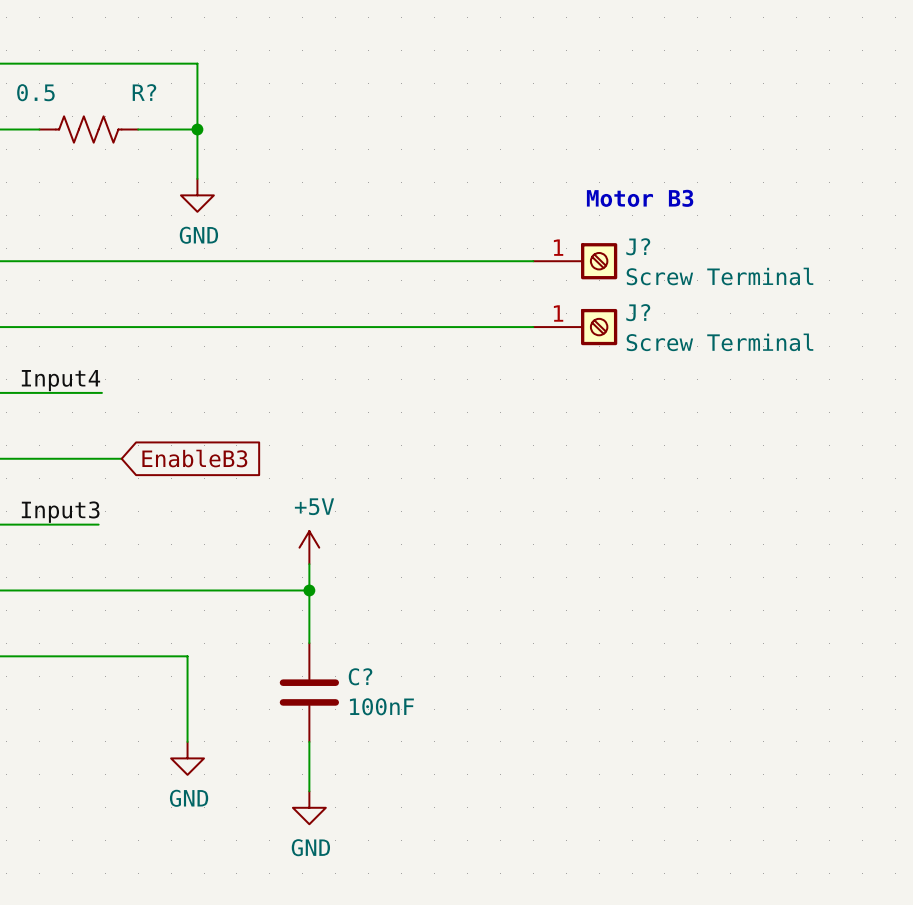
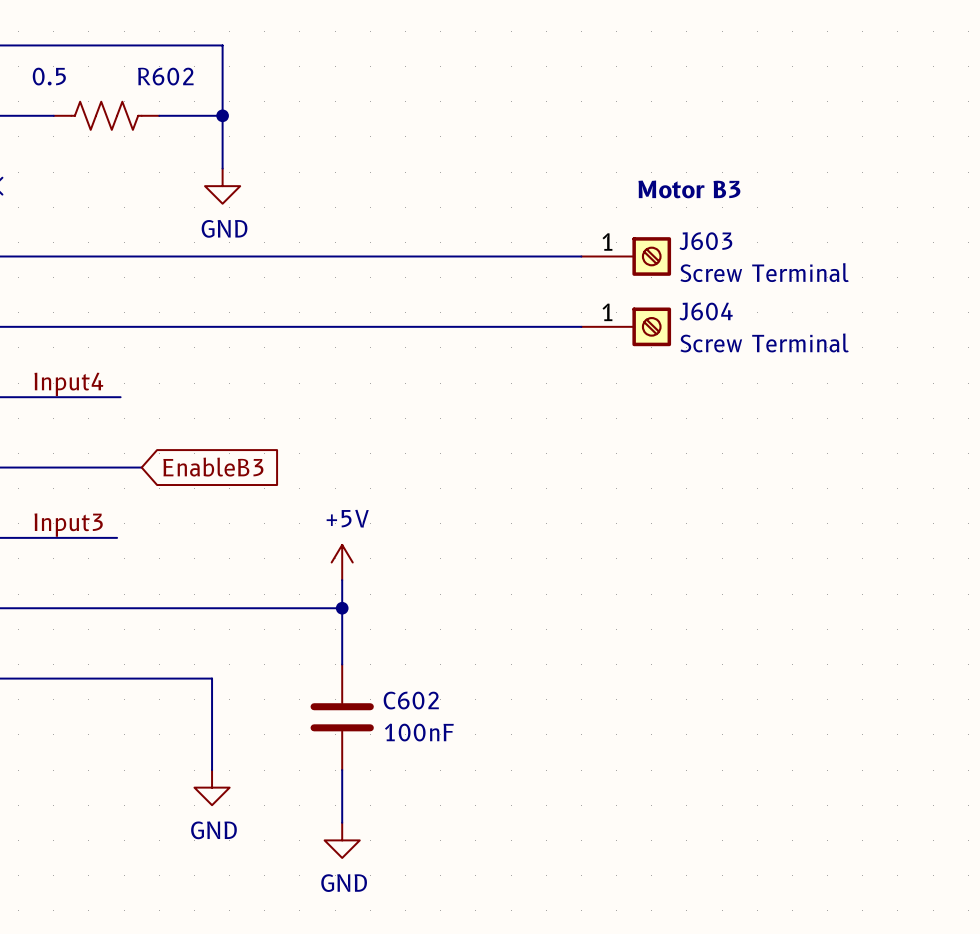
R? name: R? (144, 92) -> R602 (165, 76)
J? name: J? (638, 246) -> J603 (705, 241)
J? name: J? (638, 312) -> J604 (706, 311)
C? name: C? (360, 676) -> C602 (411, 700)

